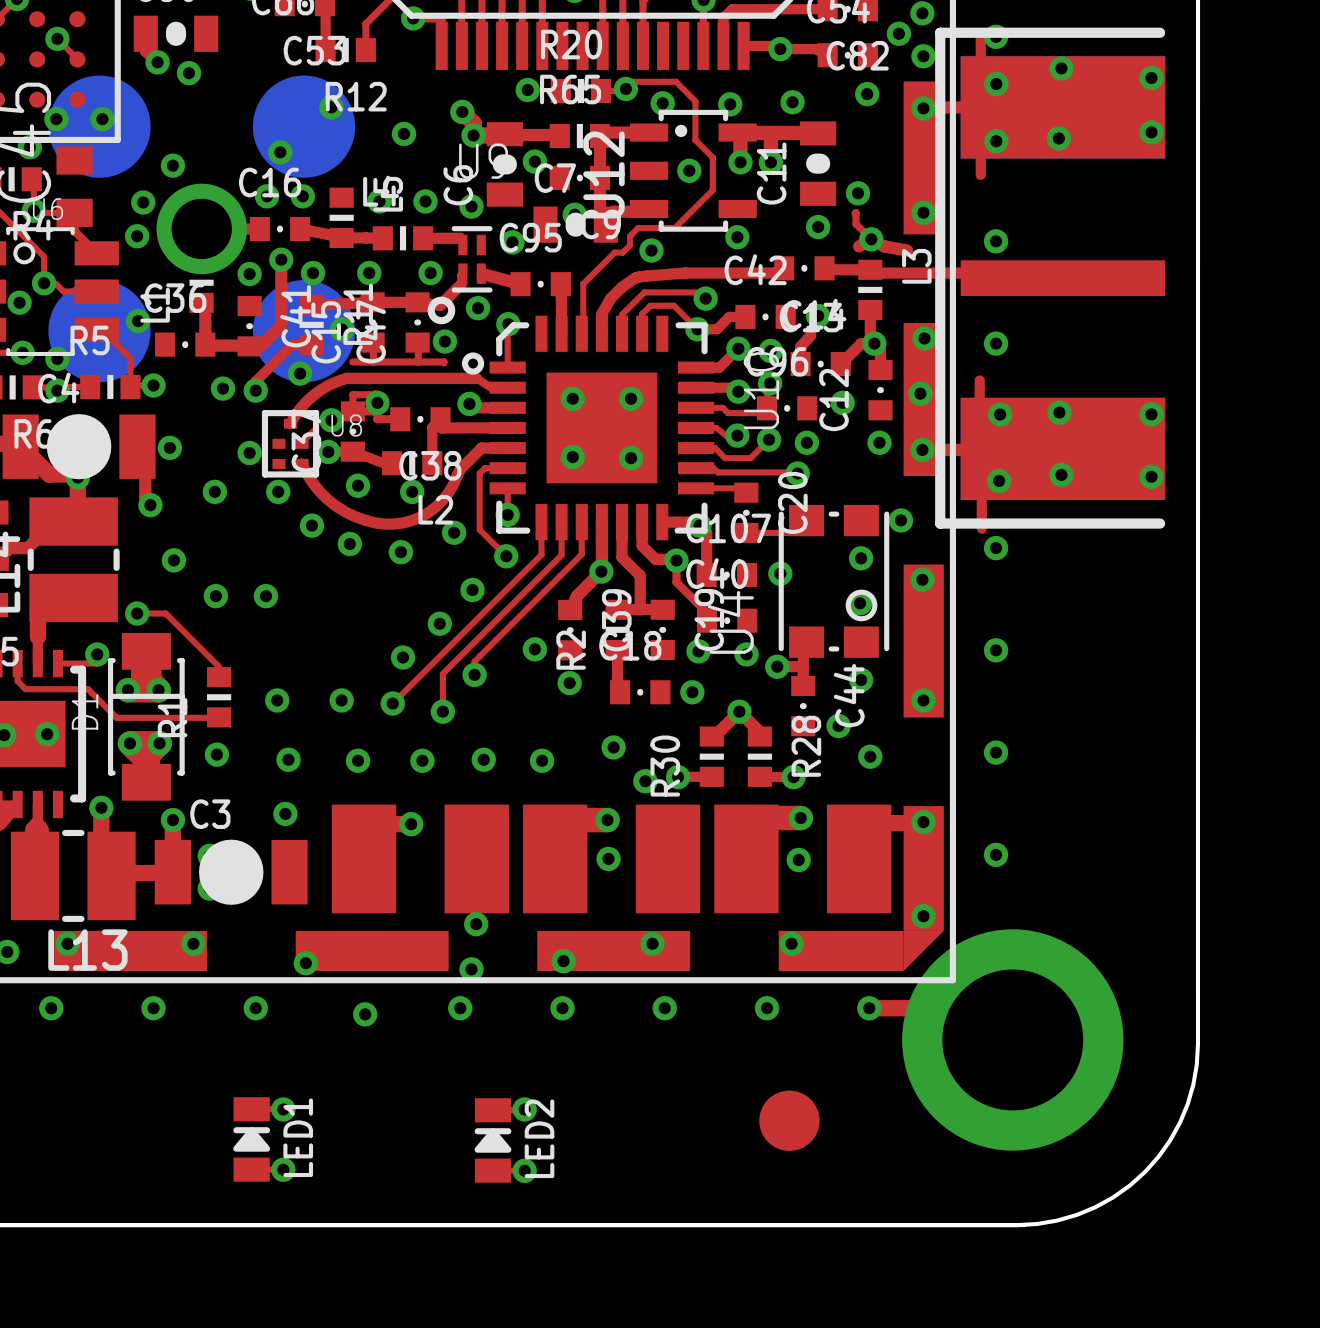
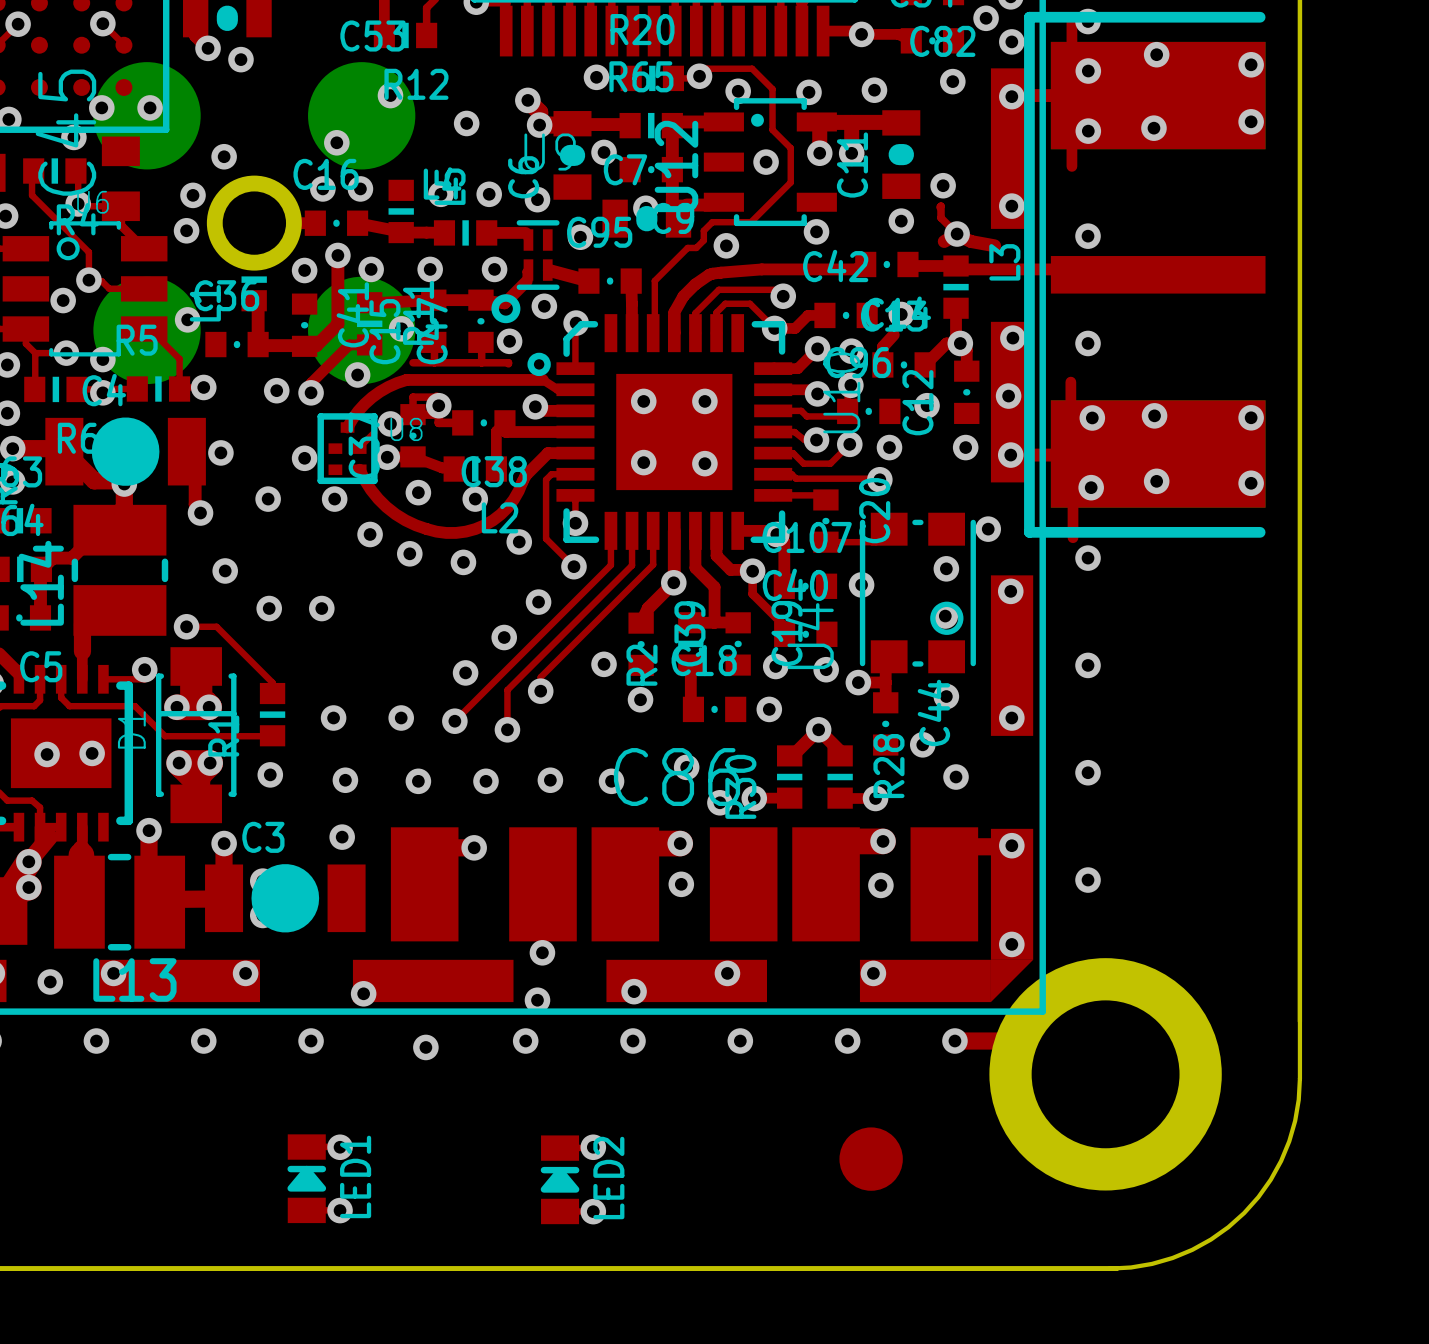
C86 name: none -> C86 (676, 777)

